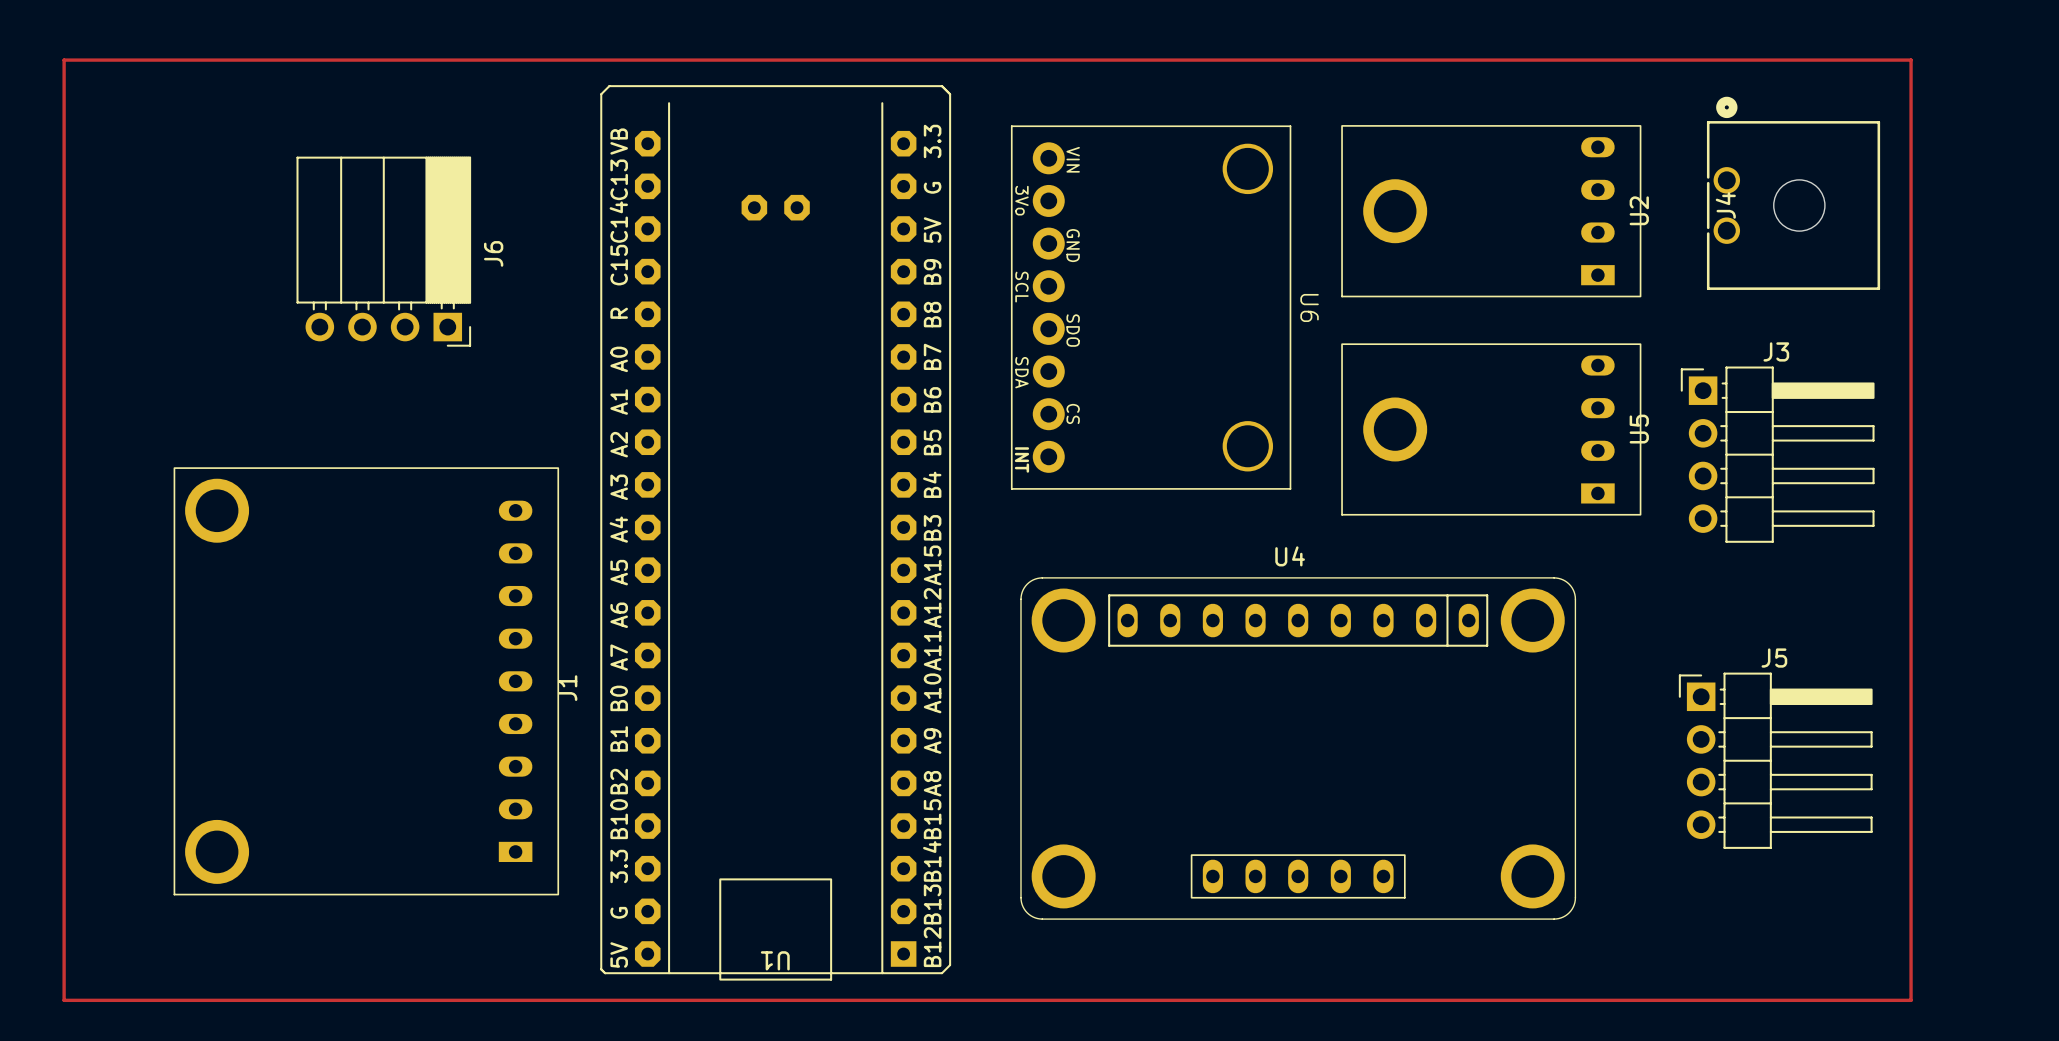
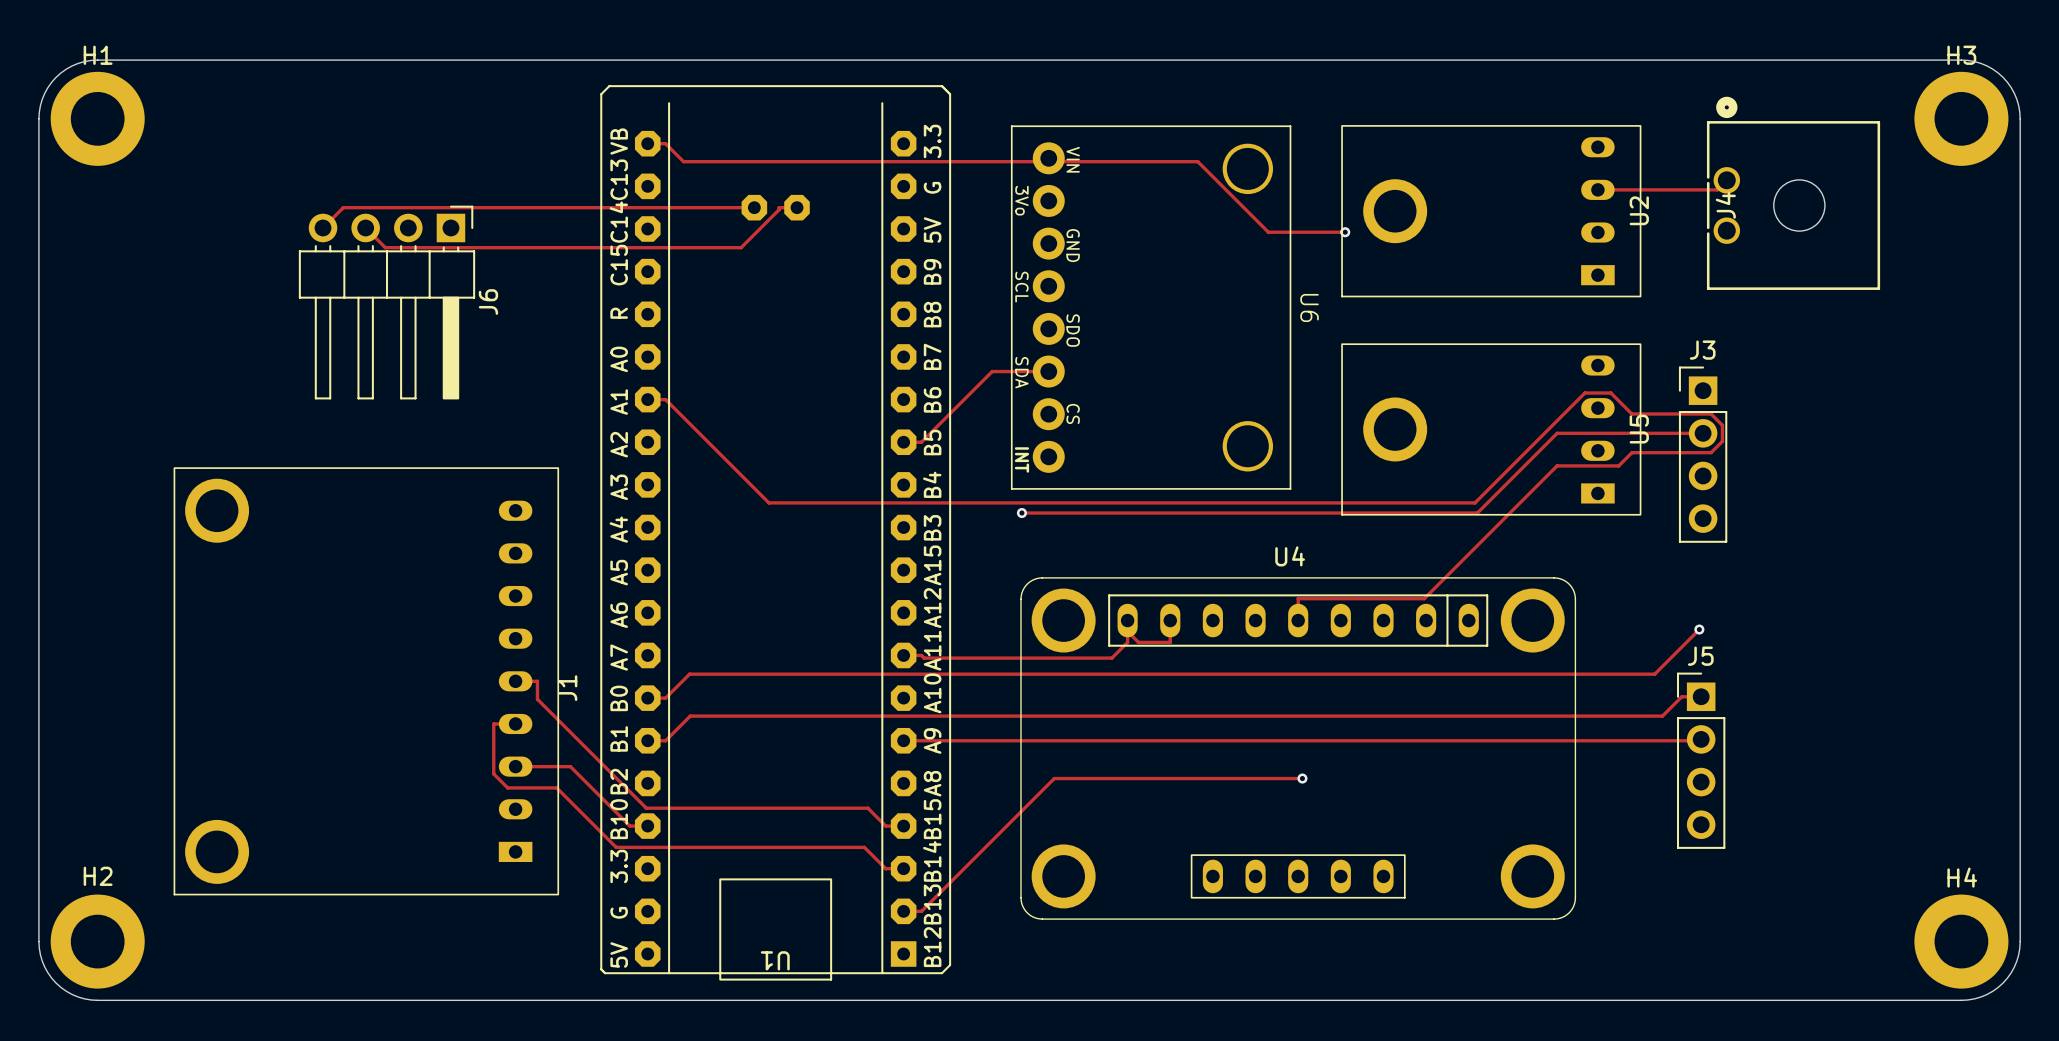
track: (64, 60) (1911, 60) (1911, 1000) (64, 1000) (64, 60) -> none
board edge: none -> (97, 60) (1961, 60) (1986, 65) (2002, 77) (2011, 87) (2018, 105) (2020, 118) (2020, 941) (2014, 967) (2002, 983) (1992, 991) (1974, 998) (1961, 1000) (97, 1000) (72, 994) (61, 987) (47, 972) (42, 960) (38, 941) (38, 118) (44, 93) (56, 77) (78, 63) (97, 60)
H1: none -> (97, 118)
H3: none -> (1961, 118)
track: none -> (647, 143) (665, 143) (683, 161) (1197, 161) (1268, 232) (1345, 232)
J6 footprint: [296, 156, 472, 347] -> [298, 205, 476, 400]
track: none -> (1726, 180) (1717, 189) (1597, 189)
track: none -> (754, 207) (343, 207) (323, 227)
track: none -> (797, 207) (779, 207) (741, 247) (385, 247) (365, 227)
via: none -> (1345, 232)
J3 footprint: [1680, 366, 1875, 543] -> [1678, 366, 1728, 543]
track: none -> (1048, 371) (992, 371) (921, 442) (903, 442)
track: none -> (647, 399) (665, 399) (768, 502) (1475, 502) (1584, 393) (1610, 393) (1631, 413) (1711, 414) (1722, 425) (1722, 441) (1711, 452) (1631, 452) (1618, 465) (1557, 465) (1424, 598) (1298, 598) (1298, 620)
track: none -> (1703, 433) (1557, 433) (1477, 513) (1021, 513)
via: none -> (1021, 513)
track: none -> (1127, 620) (1127, 642) (1111, 658) (924, 658) (921, 655) (903, 655)
track: none -> (1170, 620) (1170, 642) (1138, 642) (1127, 631)
track: none -> (1699, 629) (1654, 674) (689, 674) (665, 698) (647, 698)
via: none -> (1699, 629)
J5 footprint: [1678, 672, 1873, 849] -> [1676, 672, 1726, 849]
track: none -> (515, 681) (537, 681) (537, 699) (646, 808) (867, 808) (885, 826) (903, 826)
track: none -> (1701, 696) (1681, 696) (1662, 716) (690, 716) (665, 740) (647, 740)
track: none -> (515, 723) (493, 723) (493, 773) (507, 787) (556, 787) (616, 847) (864, 847) (885, 868) (903, 868)
track: none -> (1701, 739) (903, 740)
track: none -> (515, 766) (570, 766) (629, 826) (647, 826)
track: none -> (1302, 778) (1054, 778) (921, 911) (903, 911)
via: none -> (1302, 778)
H2: none -> (97, 941)
H4: none -> (1961, 941)

